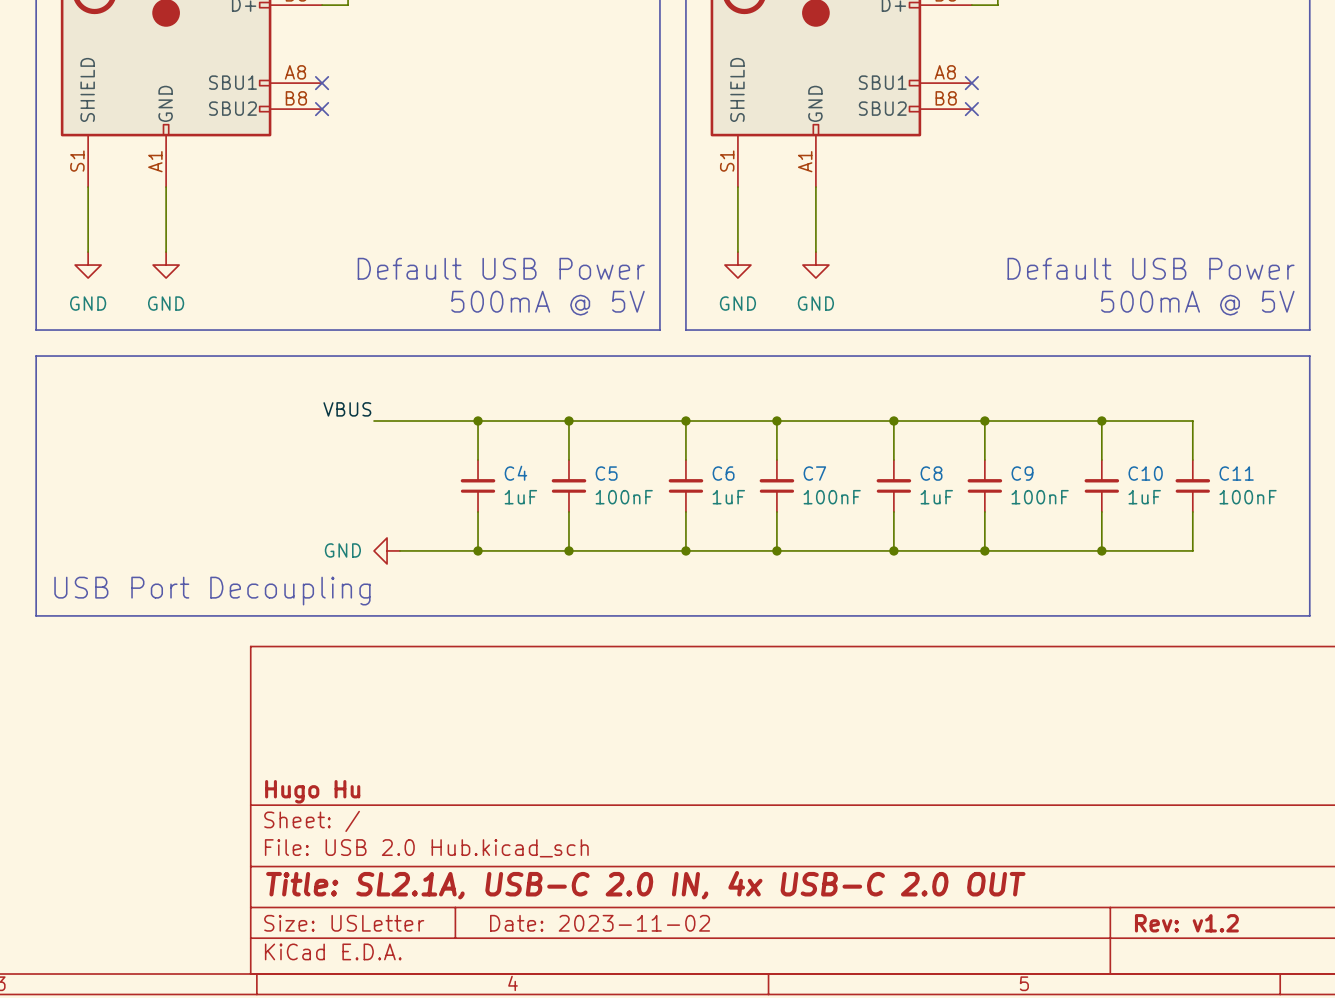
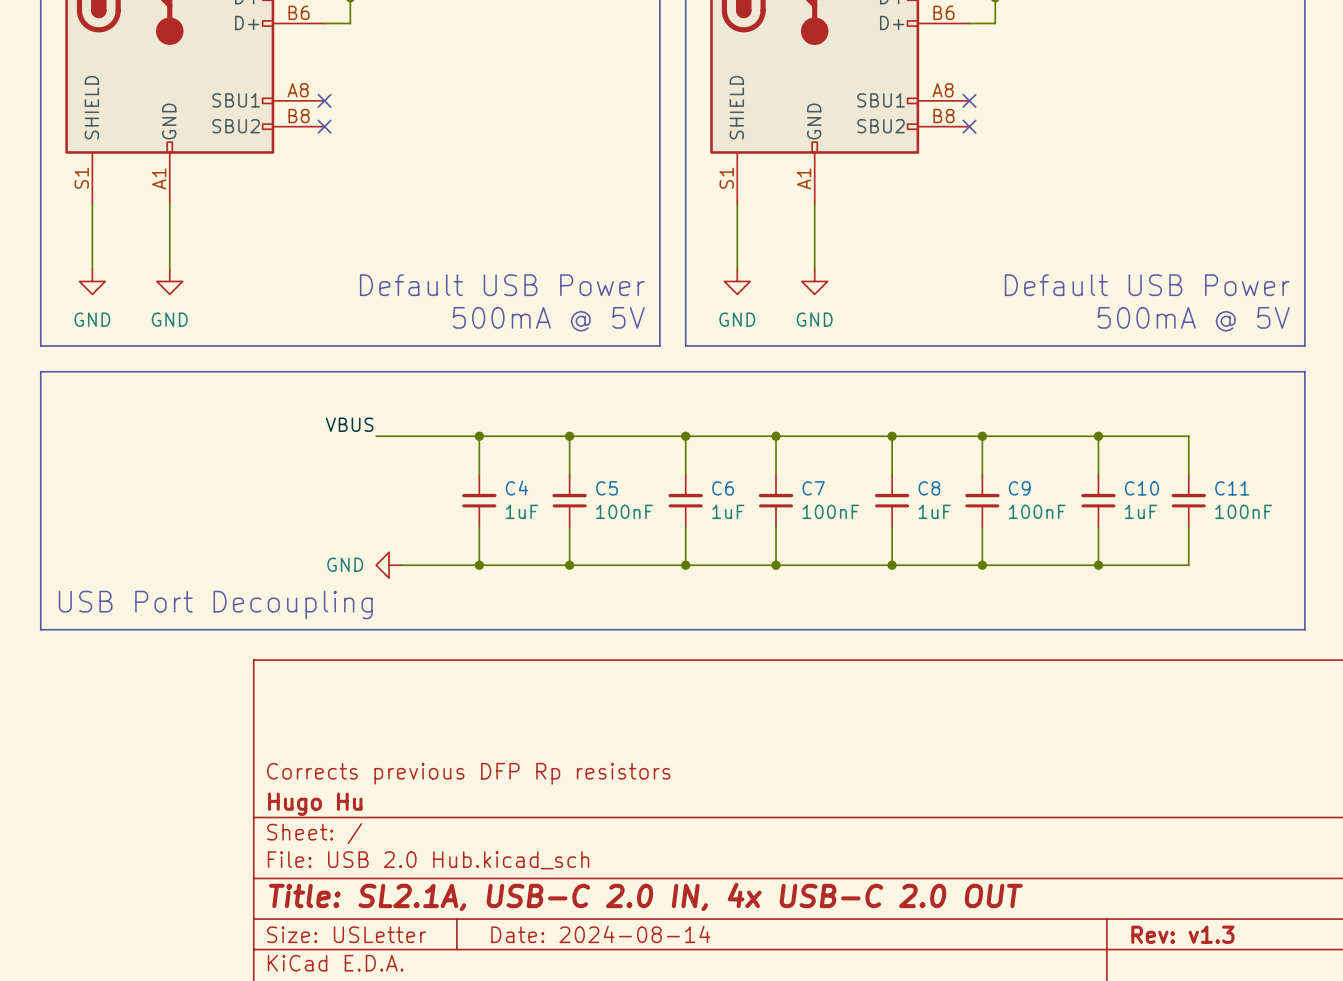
title block: none -> Corrects previous DFP Rp resistors (468, 773)
title block: Date: 2023-11-02 (600, 923) -> Date: 2024-08-14 (600, 934)
title block: Rev: v1.2 (1186, 923) -> Rev: v1.3 (1182, 934)

